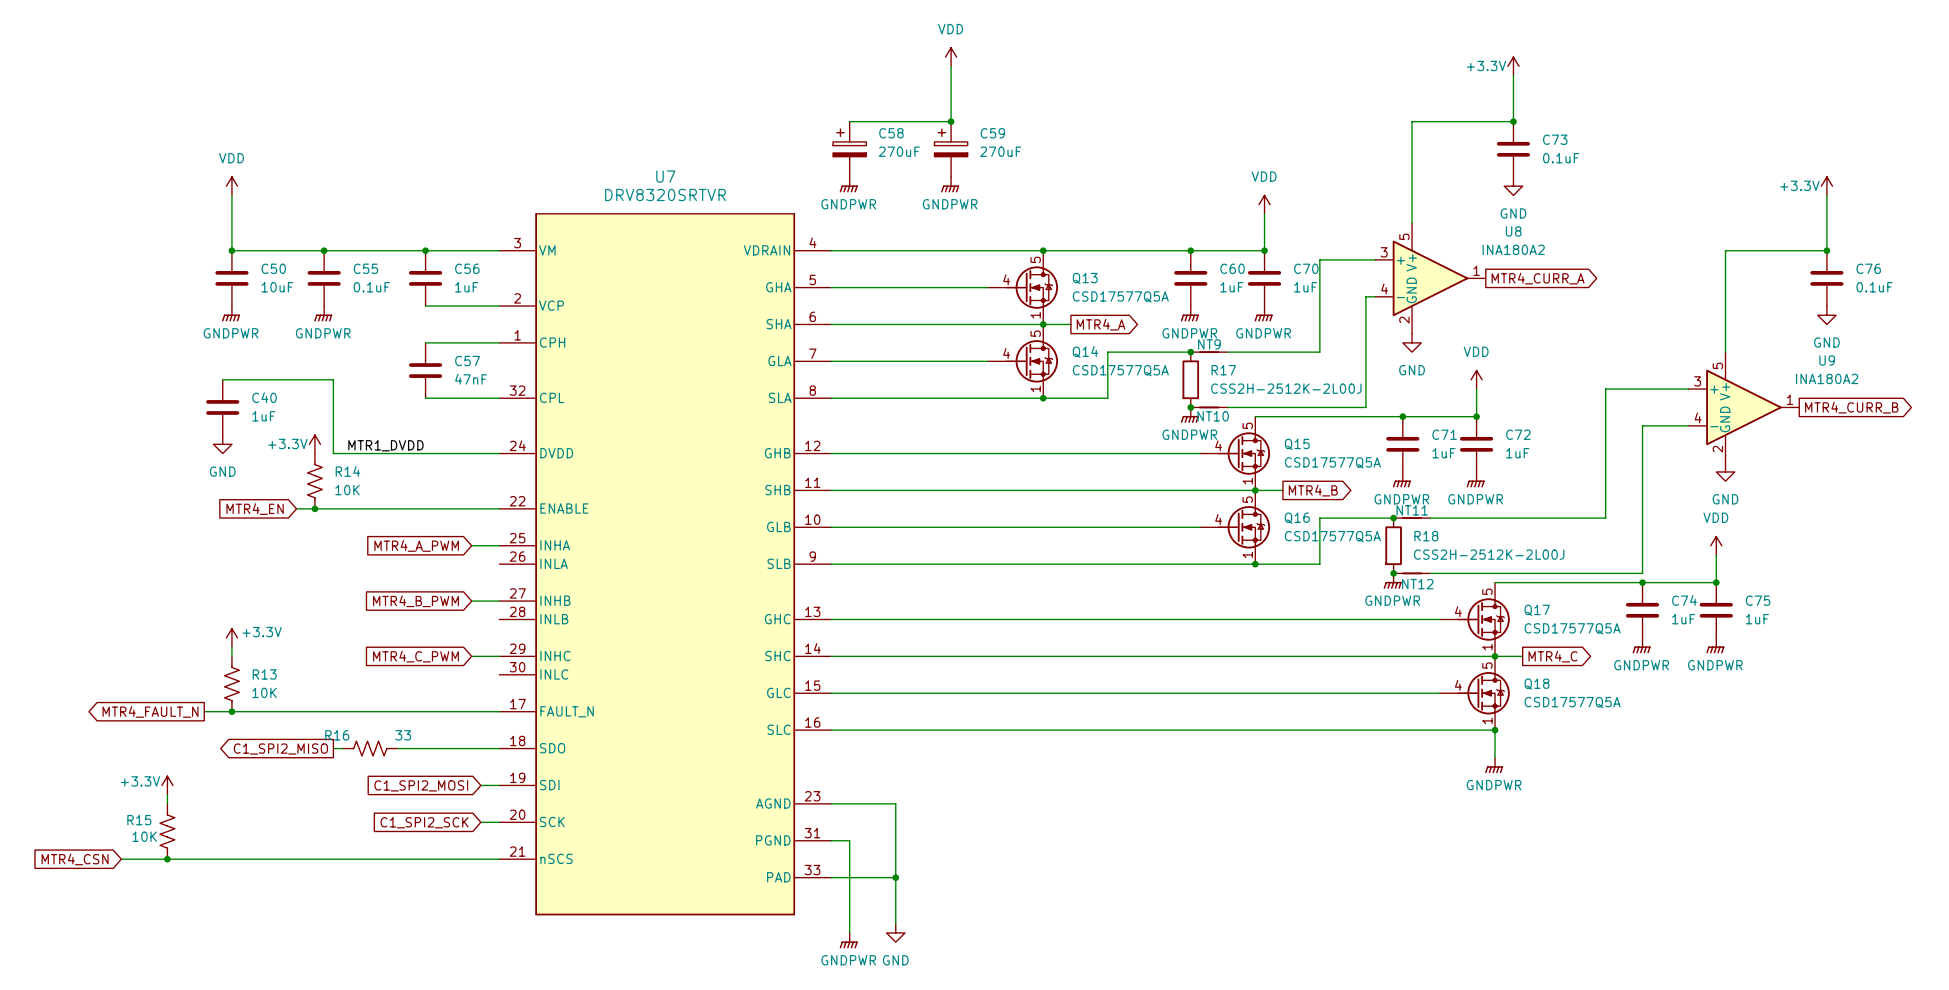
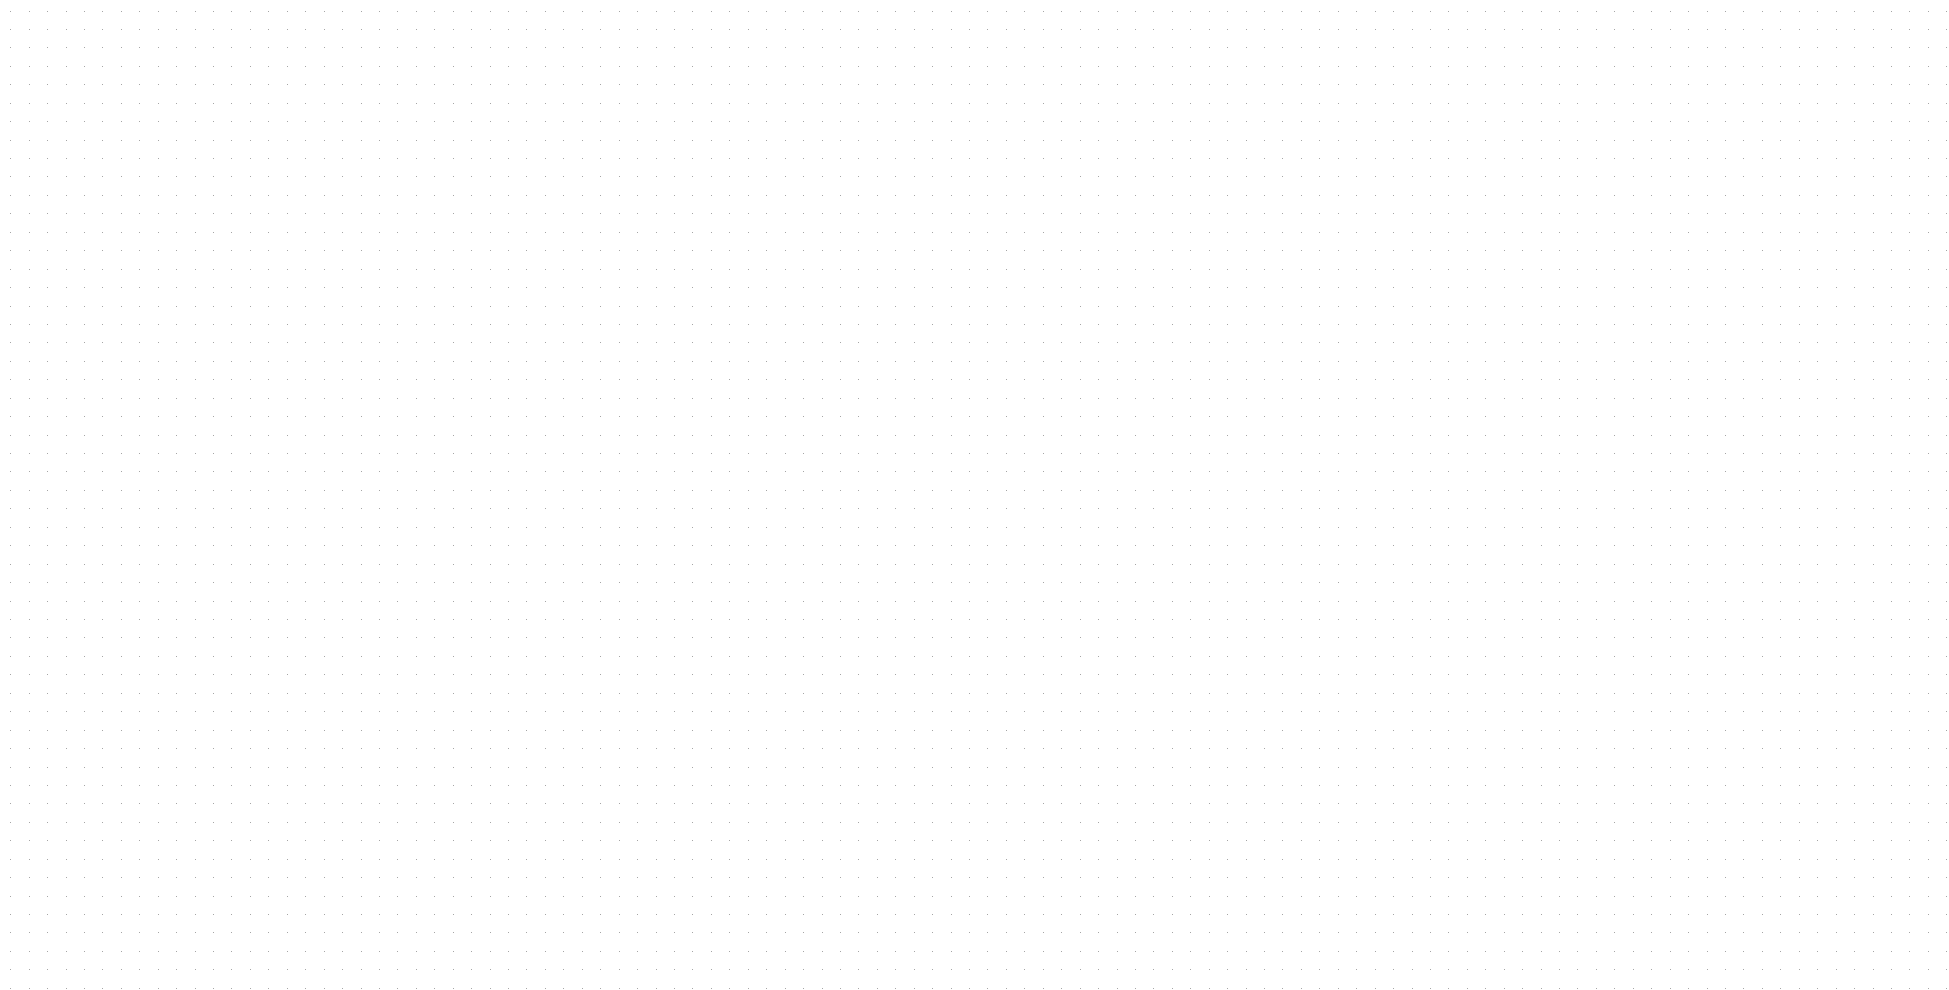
power symbol: VDD (951, 57) -> none
wire: (951, 66) (951, 121) (849, 121) -> none
power symbol: +3.3V (1513, 66) -> none
wire: (1513, 75) (1513, 121) (1412, 121) (1412, 223) -> none
junction: (951, 121) -> none
junction: (1513, 121) -> none
C58: 270uF (849, 149) -> none
C59: 270uF (951, 149) -> none
C73: 0.1uF (1513, 149) -> none
power symbol: GNDPWR (848, 184) -> none
power symbol: GNDPWR (950, 184) -> none
power symbol: VDD (231, 186) -> none
power symbol: GND (1513, 186) -> none
power symbol: +3.3V (1826, 186) -> none
wire: (231, 195) (231, 250) (499, 250) -> none
wire: (1826, 195) (1826, 250) (1725, 250) (1725, 352) -> none
power symbol: VDD (1264, 204) -> none
wire: (1264, 213) (1264, 250) (831, 250) -> none
junction: (231, 250) -> none
junction: (324, 250) -> none
junction: (425, 250) -> none
junction: (1043, 250) -> none
junction: (1190, 250) -> none
junction: (1264, 250) -> none
junction: (1826, 250) -> none
wire: (1375, 259) (1319, 259) (1319, 352) (1227, 352) -> none
C50: 10uF (231, 278) -> none
C55: 0.1uF (324, 278) -> none
C56: 1uF (425, 278) -> none
C60: 1uF (1190, 278) -> none
C70: 1uF (1264, 278) -> none
U8: INA180A2 (1430, 278) -> none
global label: MTR4_CURR_A (1538, 278) -> none
C76: 0.1uF (1826, 278) -> none
wire: (831, 287) (987, 287) -> none
Q13: CSD17577Q5A (1022, 287) -> none
wire: (1375, 296) (1365, 296) (1365, 407) (1227, 407) -> none
wire: (425, 306) (499, 306) -> none
power symbol: GNDPWR (231, 313) -> none
power symbol: GNDPWR (323, 313) -> none
power symbol: GNDPWR (1189, 313) -> none
power symbol: GNDPWR (1263, 313) -> none
power symbol: GND (1826, 315) -> none
wire: (831, 324) (1070, 324) -> none
junction: (1043, 324) -> none
global label: MTR4_A (1101, 324) -> none
wire: (425, 342) (499, 342) -> none
power symbol: GND (1412, 342) -> none
wire: (1190, 352) (1107, 352) (1107, 398) (831, 398) -> none
junction: (1190, 352) -> none
NT9: (1209, 352) -> none
wire: (831, 361) (987, 361) -> none
Q14: CSD17577Q5A (1022, 361) -> none
C57: 47nF (425, 370) -> none
wire: (222, 379) (333, 379) (333, 453) (499, 453) -> none
R17: CSS2H-2512K-2L00J (1190, 379) -> none
power symbol: VDD (1476, 379) -> none
wire: (1476, 389) (1476, 416) (1255, 416) -> none
wire: (1688, 389) (1605, 389) (1605, 518) (1430, 518) -> none
wire: (425, 398) (499, 398) -> none
junction: (1043, 398) -> none
C40: 1uF (222, 407) -> none
junction: (1190, 407) -> none
NT10: (1209, 407) -> none
U9: INA180A2 (1743, 407) -> none
global label: MTR4_CURR_B (1851, 407) -> none
power symbol: GNDPWR (1189, 415) -> none
junction: (1402, 416) -> none
junction: (1476, 416) -> none
wire: (1688, 425) (1642, 425) (1642, 573) (1430, 573) -> none
power symbol: GND (222, 444) -> none
power symbol: +3.3V (314, 444) -> none
C71: 1uF (1402, 444) -> none
C72: 1uF (1476, 444) -> none
label: MTR1_DVDD (385, 445) -> none
wire: (831, 453) (1200, 453) -> none
Q15: CSD17577Q5A (1235, 453) -> none
power symbol: GND (1725, 471) -> none
power symbol: GNDPWR (1401, 479) -> none
power symbol: GNDPWR (1475, 479) -> none
R14: 10K (314, 481) -> none
wire: (831, 490) (1282, 490) -> none
junction: (1255, 490) -> none
global label: MTR4_B (1313, 490) -> none
wire: (296, 508) (499, 508) -> none
junction: (314, 508) -> none
global label: MTR4_EN (255, 509) -> none
wire: (1393, 518) (1319, 518) (1319, 564) (831, 564) -> none
junction: (1393, 518) -> none
NT11: (1412, 518) -> none
wire: (831, 527) (1200, 527) -> none
Q16: CSD17577Q5A (1235, 527) -> none
global label: MTR4_A_PWM (416, 545) -> none
wire: (471, 545) (499, 545) -> none
R18: CSS2H-2512K-2L00J (1393, 545) -> none
power symbol: VDD (1716, 545) -> none
wire: (1716, 554) (1716, 582) (1495, 582) -> none
U7: DRV8320SRTVR (665, 564) -> none
junction: (1255, 564) -> none
junction: (1393, 573) -> none
NT12: (1412, 573) -> none
power symbol: GNDPWR (1392, 581) -> none
junction: (1642, 582) -> none
junction: (1716, 582) -> none
global label: MTR4_B_PWM (416, 601) -> none
wire: (471, 601) (499, 601) -> none
C74: 1uF (1642, 610) -> none
C75: 1uF (1716, 610) -> none
wire: (831, 619) (1439, 619) -> none
Q17: CSD17577Q5A (1474, 619) -> none
power symbol: +3.3V (231, 637) -> none
power symbol: GNDPWR (1641, 645) -> none
power symbol: GNDPWR (1715, 645) -> none
wire: (231, 647) (231, 656) -> none
global label: MTR4_C_PWM (416, 656) -> none
wire: (471, 656) (499, 656) -> none
wire: (831, 656) (1522, 656) -> none
junction: (1495, 656) -> none
global label: MTR4_C (1552, 656) -> none
R13: 10K (231, 684) -> none
wire: (831, 693) (1439, 693) -> none
Q18: CSD17577Q5A (1474, 693) -> none
global label: MTR4_FAULT_N (150, 711) -> none
wire: (204, 711) (499, 711) -> none
junction: (231, 711) -> none
wire: (831, 730) (1495, 730) (1495, 757) -> none
junction: (1495, 730) -> none
wire: (333, 748) (342, 748) -> none
R16: 33 (370, 748) -> none
wire: (397, 748) (499, 748) -> none
global label: C1_SPI2_MISO (280, 749) -> none
power symbol: GNDPWR (1494, 765) -> none
power symbol: +3.3V (167, 785) -> none
global label: C1_SPI2_MOSI (421, 785) -> none
wire: (480, 785) (499, 785) -> none
wire: (167, 794) (167, 803) -> none
wire: (831, 803) (895, 803) (895, 923) -> none
global label: C1_SPI2_SCK (424, 822) -> none
wire: (480, 822) (499, 822) -> none
R15: 10K (167, 831) -> none
wire: (831, 840) (849, 840) (849, 932) -> none
global label: MTR4_CSN (75, 859) -> none
wire: (121, 859) (499, 859) -> none
junction: (167, 859) -> none
wire: (831, 877) (895, 877) -> none
junction: (895, 877) -> none
power symbol: GND (895, 932) -> none
power symbol: GNDPWR (848, 940) -> none

